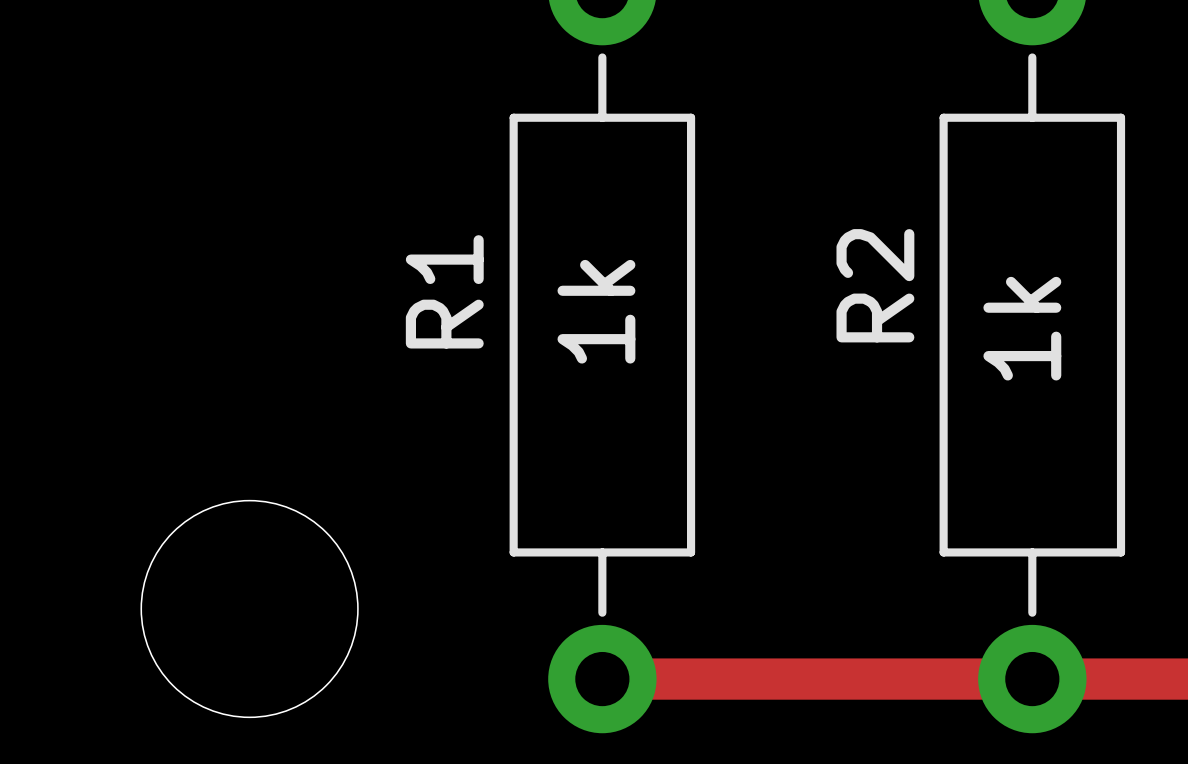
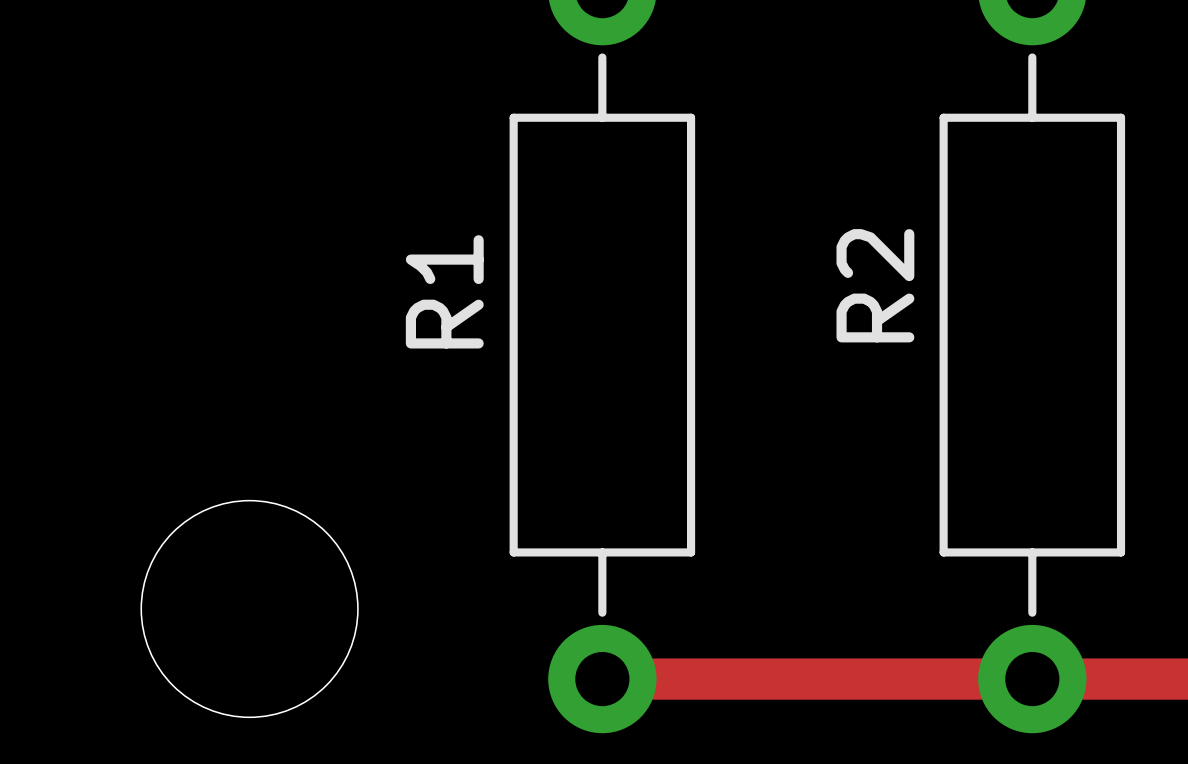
text: 1k (596, 311) -> none
text: 1k (1022, 328) -> none

